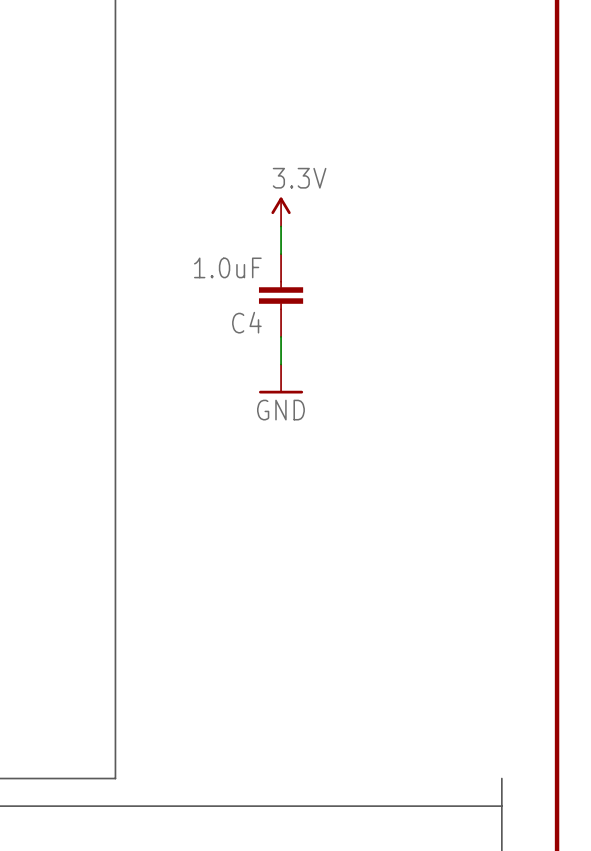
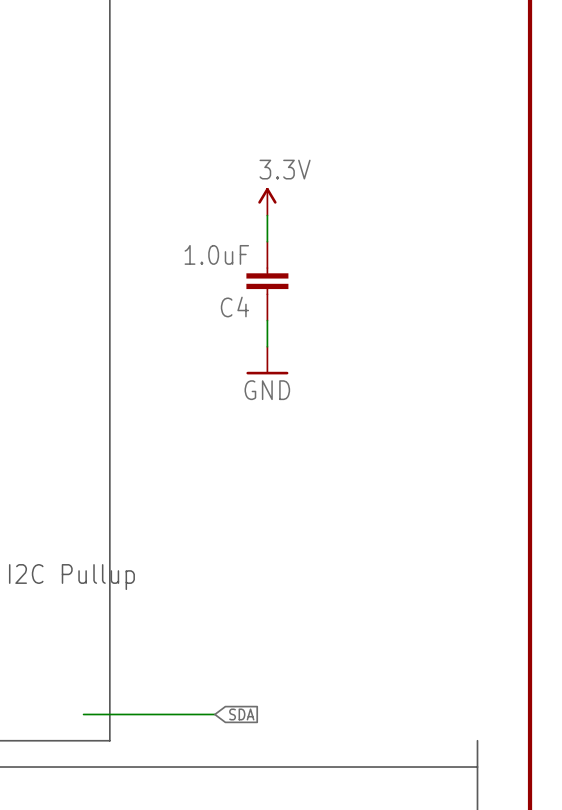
text: none -> I2C Pullup (71, 577)
wire: none -> (83, 714) (214, 714)
global label: none -> SDA (241, 714)

